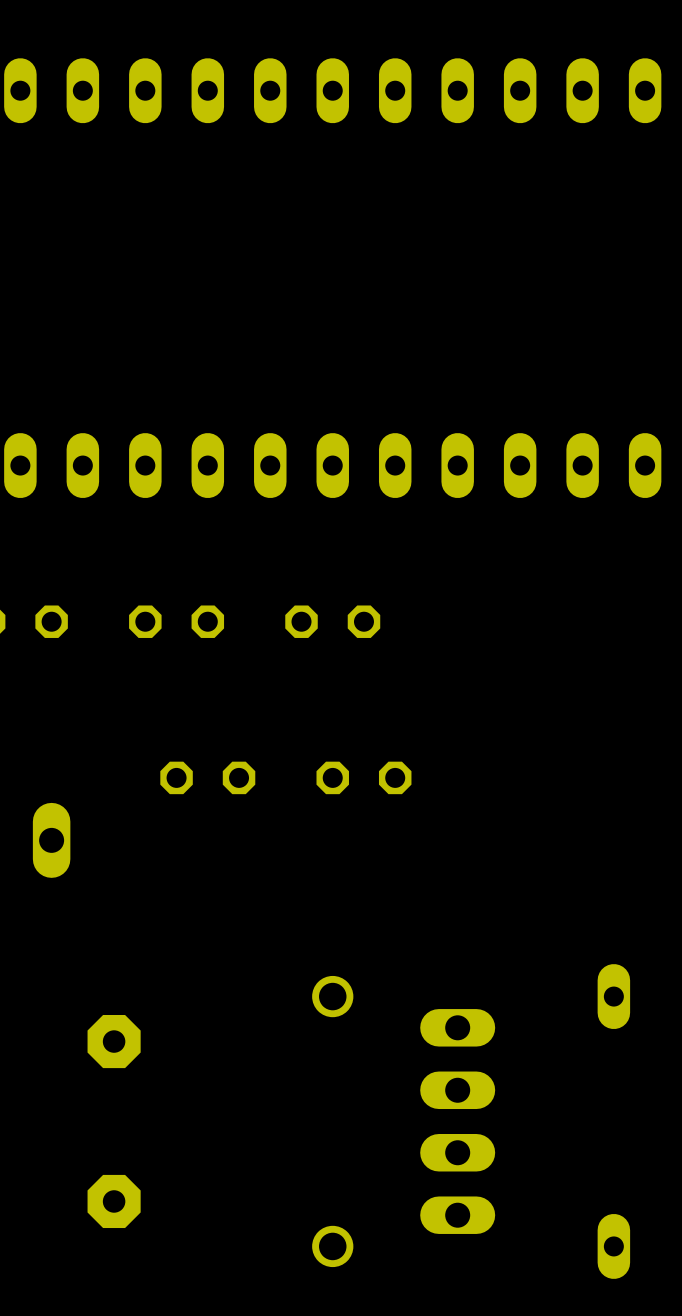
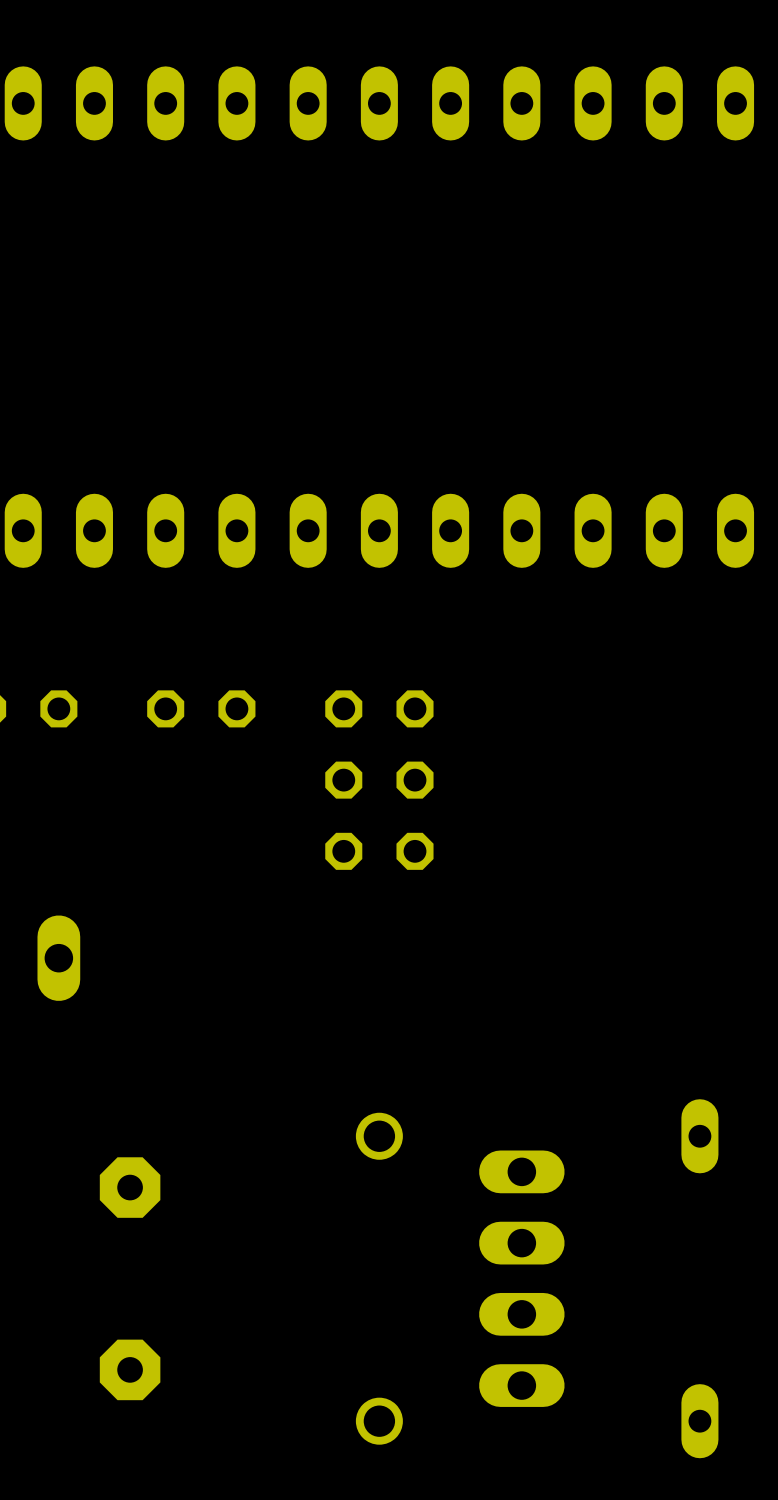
part: none -> (379, 780)
part: (207, 777) -> none
part position: (363, 777) -> (379, 851)

